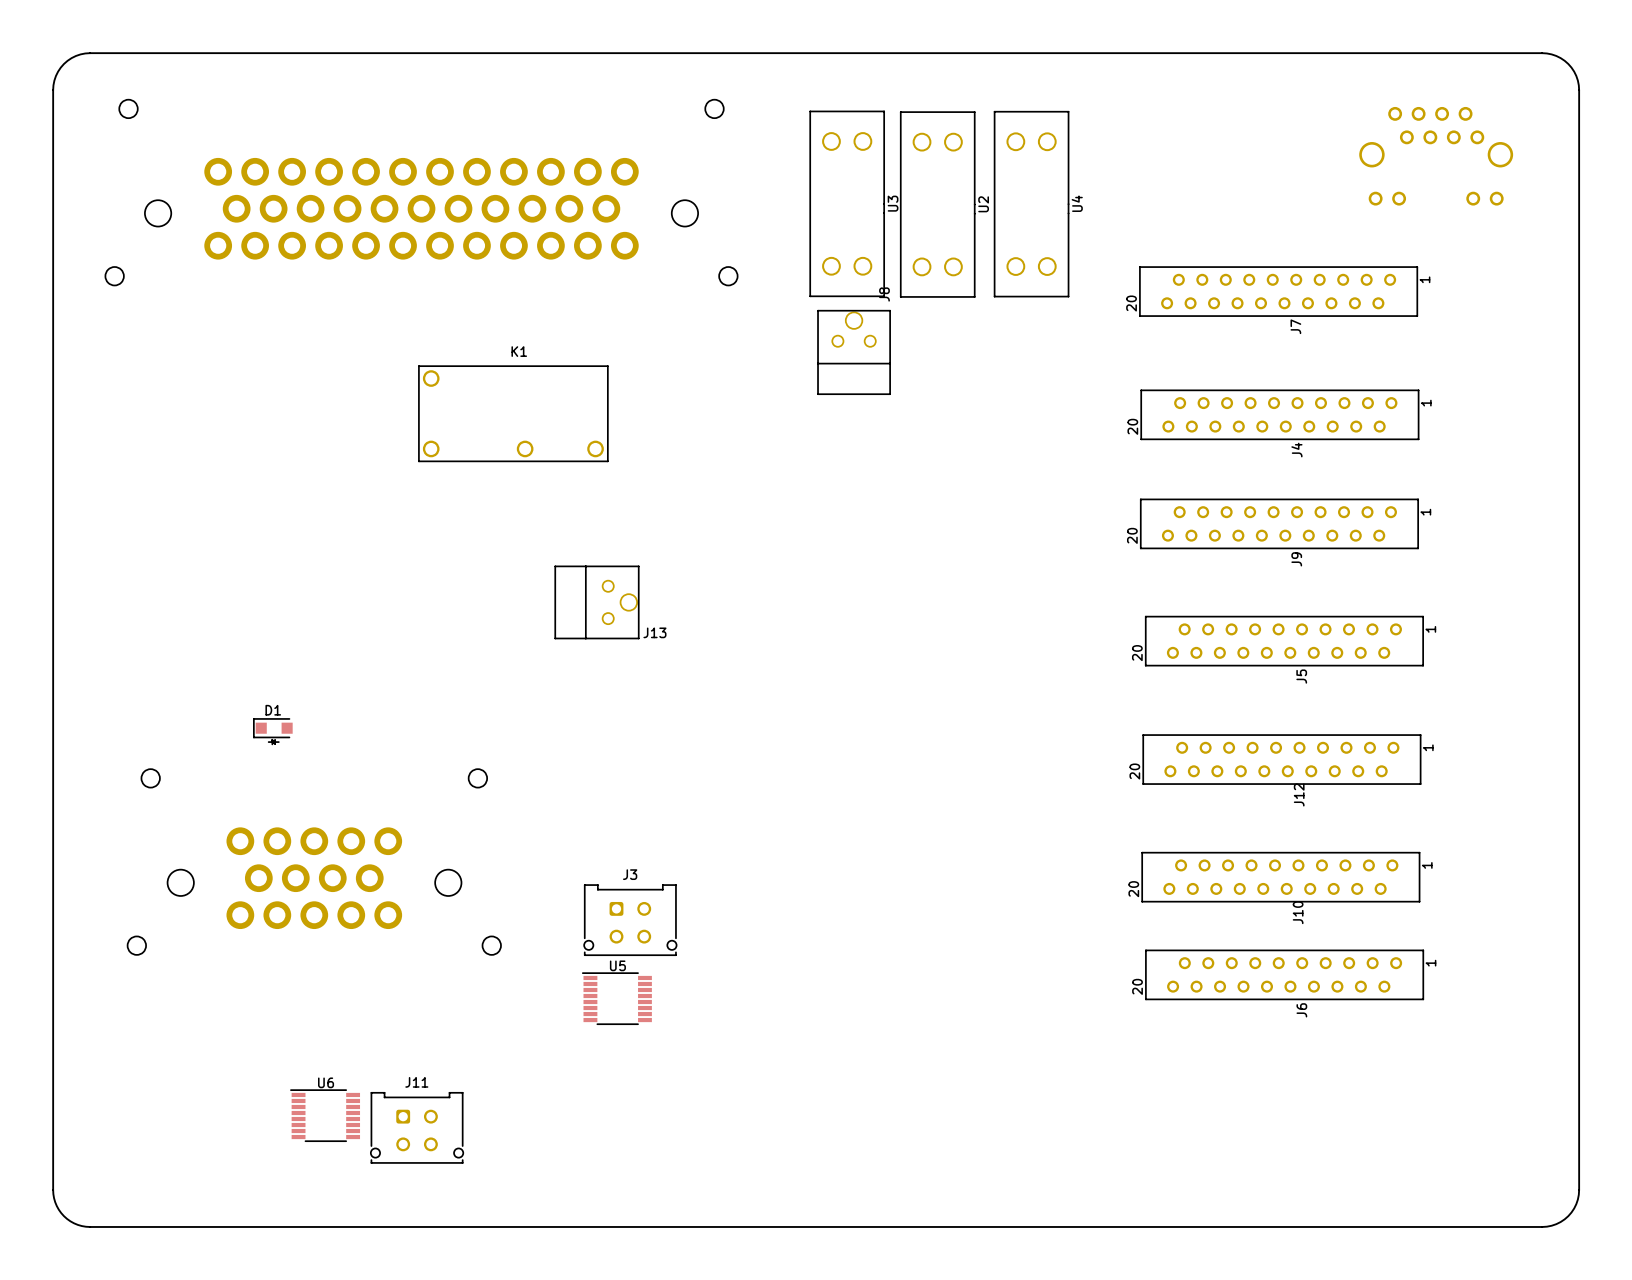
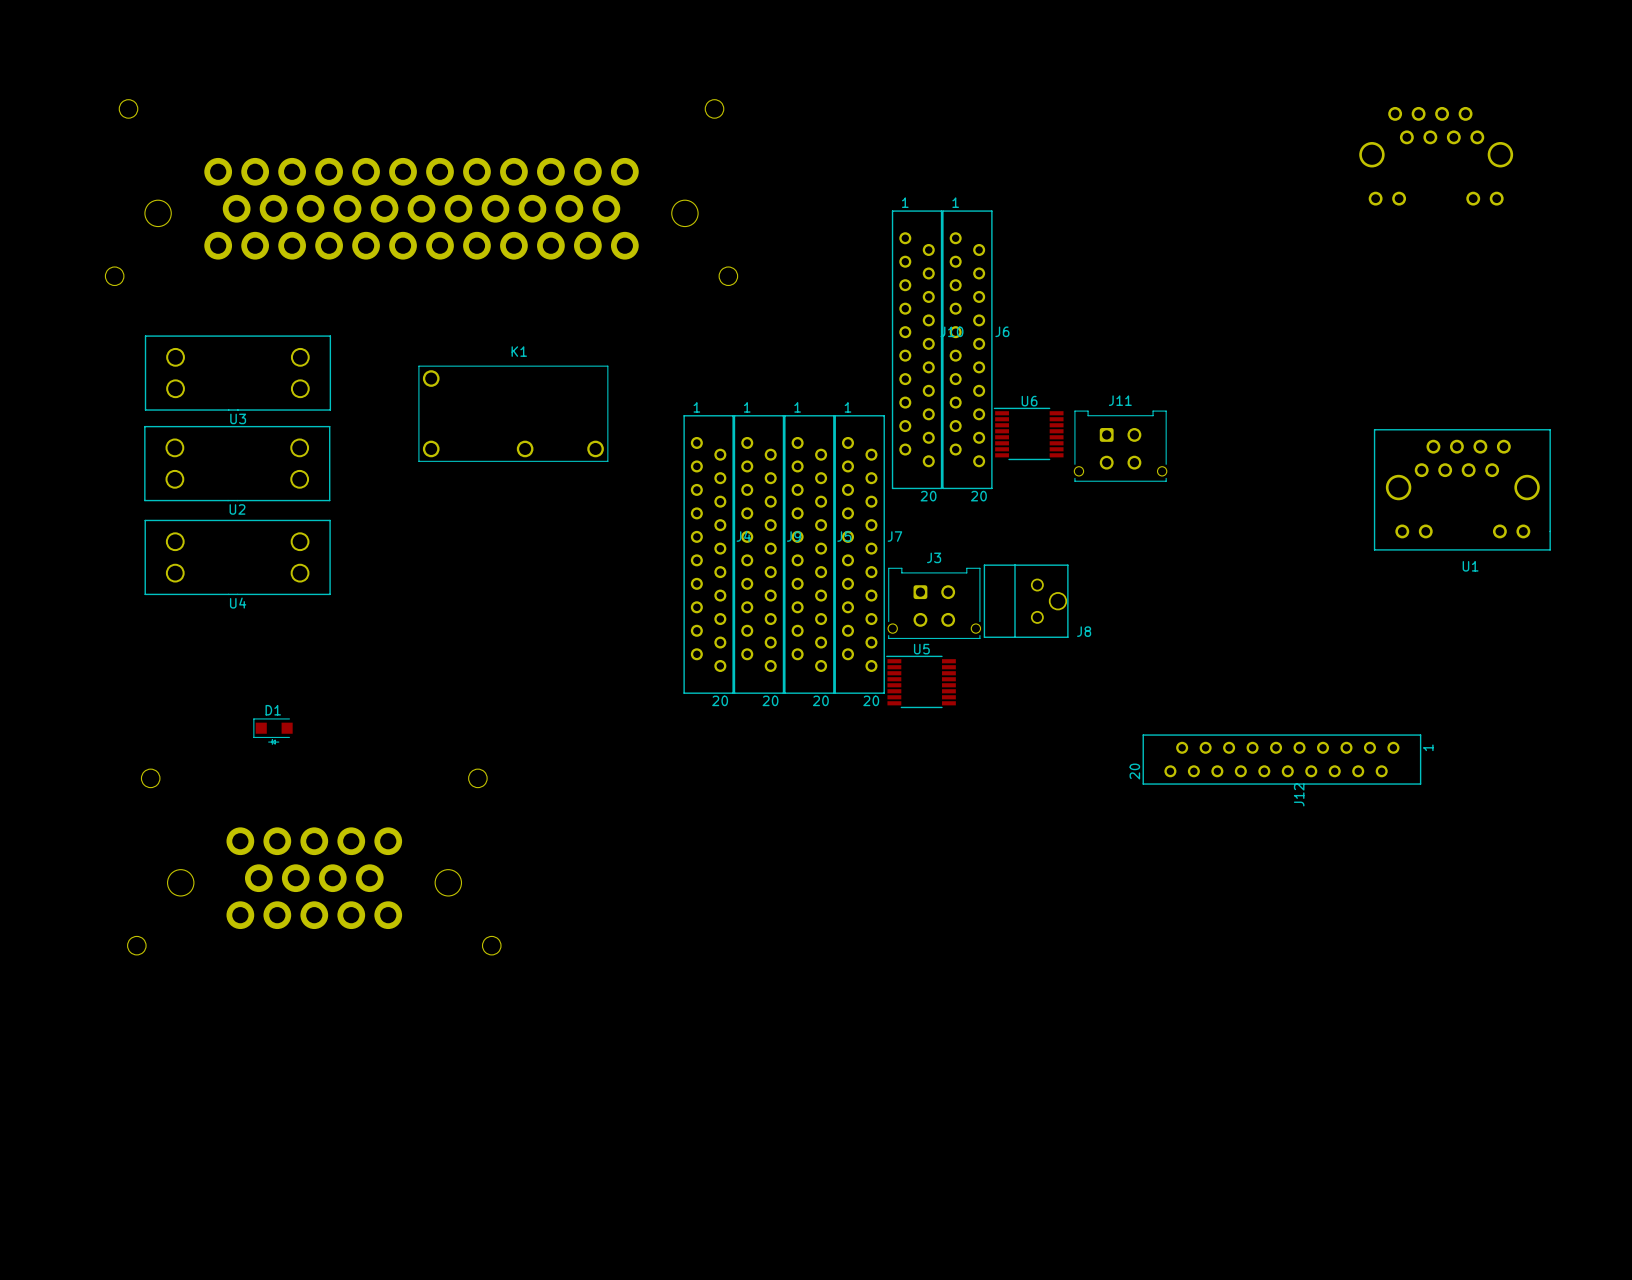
board edge: (90, 53) (1542, 53) (1556, 55) (1564, 60) (1574, 71) (1579, 90) (1579, 1190) (1576, 1204) (1571, 1212) (1560, 1222) (1542, 1226) (90, 1226) (77, 1224) (67, 1218) (56, 1206) (53, 1190) (53, 90) (55, 75) (63, 63) (75, 55) (90, 53) -> none
U3 rotation: 0° (847, 203) -> 90° clockwise (237, 373)
U3 position: (847, 203) -> (237, 373)
U2 rotation: 0° (937, 204) -> 90° clockwise (237, 463)
U2 position: (937, 204) -> (237, 463)
U4 rotation: 0° (1031, 204) -> 90° clockwise (237, 557)
U4 position: (1031, 204) -> (237, 557)
J7 rotation: 0° (1278, 291) -> 90° counterclockwise (859, 554)
J7 position: (1278, 291) -> (859, 554)
J8 rotation: 0° (854, 352) -> 90° clockwise (1026, 601)
J8 position: (854, 352) -> (1026, 601)
J4 rotation: 0° (1279, 414) -> 90° counterclockwise (708, 554)
J4 position: (1279, 414) -> (708, 554)
U1: none -> (1462, 489)
J9 rotation: 0° (1279, 523) -> 90° counterclockwise (758, 554)
J9 position: (1279, 523) -> (758, 554)
J13: (596, 602) -> none
J5 rotation: 0° (1284, 641) -> 90° counterclockwise (809, 554)
J5 position: (1284, 641) -> (809, 554)
J10 rotation: 0° (1280, 877) -> 90° counterclockwise (917, 349)
J10 position: (1280, 877) -> (917, 349)
J3 position: (630, 920) -> (934, 603)
J6 rotation: 0° (1284, 974) -> 90° counterclockwise (967, 349)
J6 position: (1284, 974) -> (967, 349)
U5 position: (617, 998) -> (920, 681)
U6 position: (325, 1115) -> (1028, 433)
J11 position: (417, 1127) -> (1120, 446)

